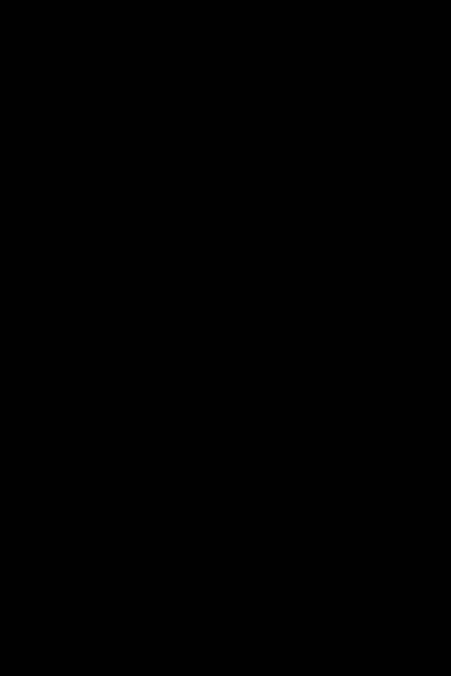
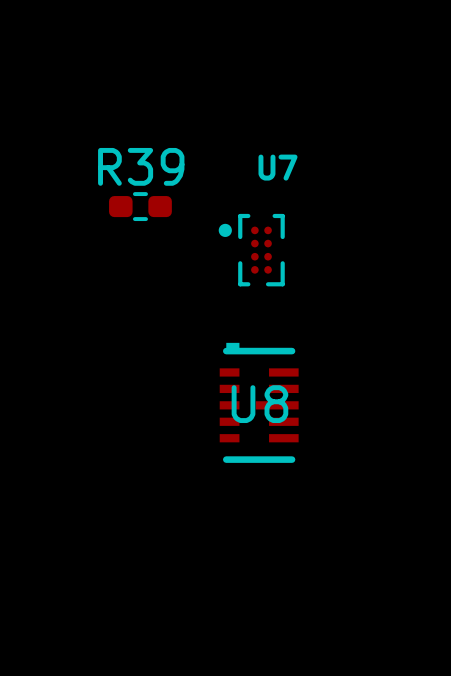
R39: none -> (140, 206)
U7: none -> (251, 250)
U8: none -> (259, 402)

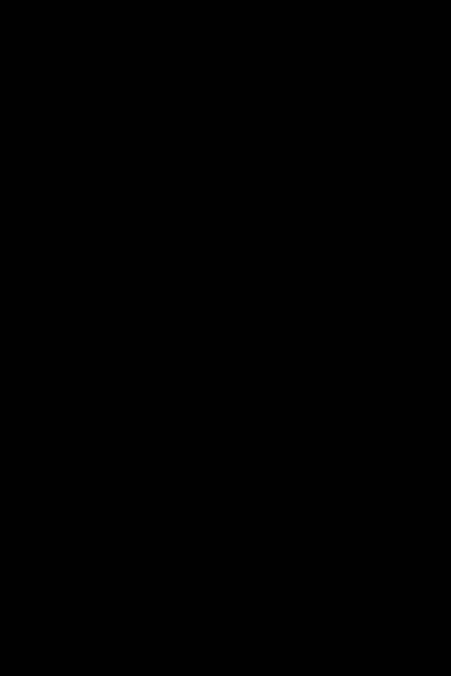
R39: (140, 206) -> none
U7: (251, 250) -> none
U8: (259, 402) -> none

